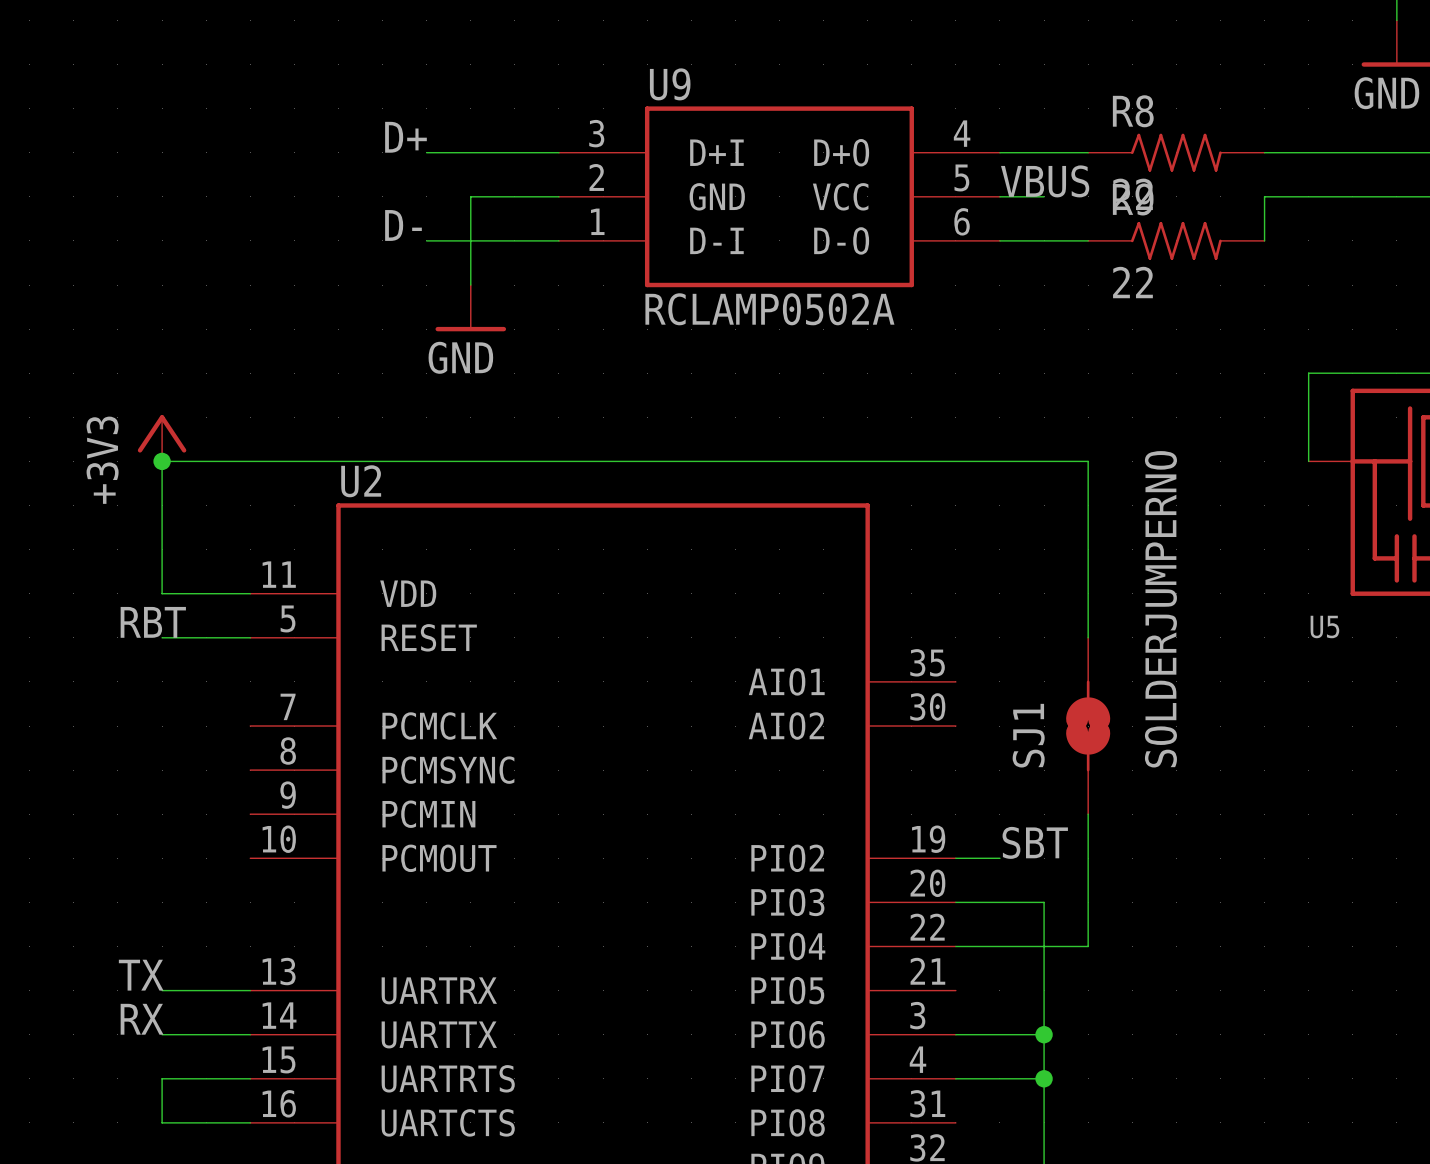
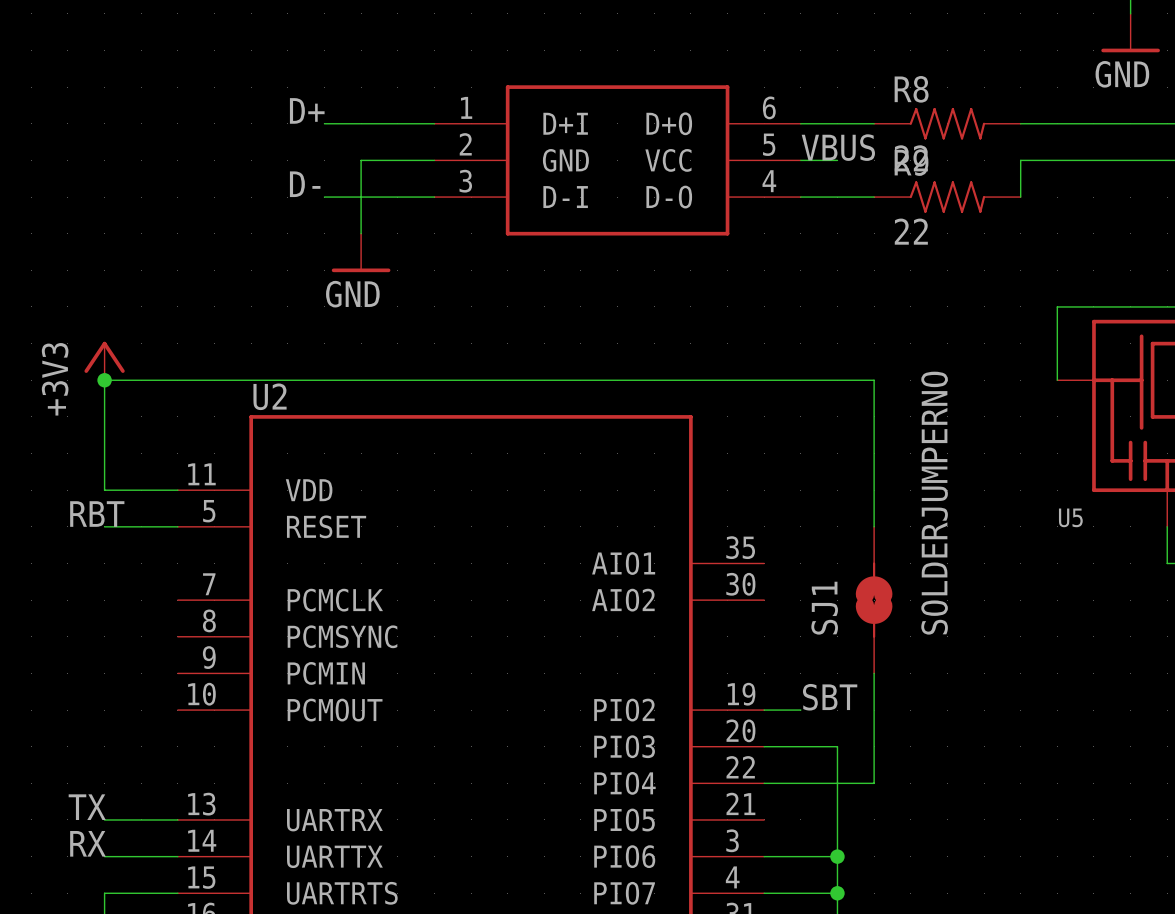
U9 name: U9 (670, 84) -> none
U9 pin number: 3 (596, 133) -> 1 (466, 107)
U9 pin number: 4 (962, 133) -> 6 (769, 107)
U9 pin number: 1 (597, 221) -> 3 (465, 181)
U9 pin number: 6 (962, 221) -> 4 (769, 181)
U9 value: RCLAMP0502A (769, 309) -> none

